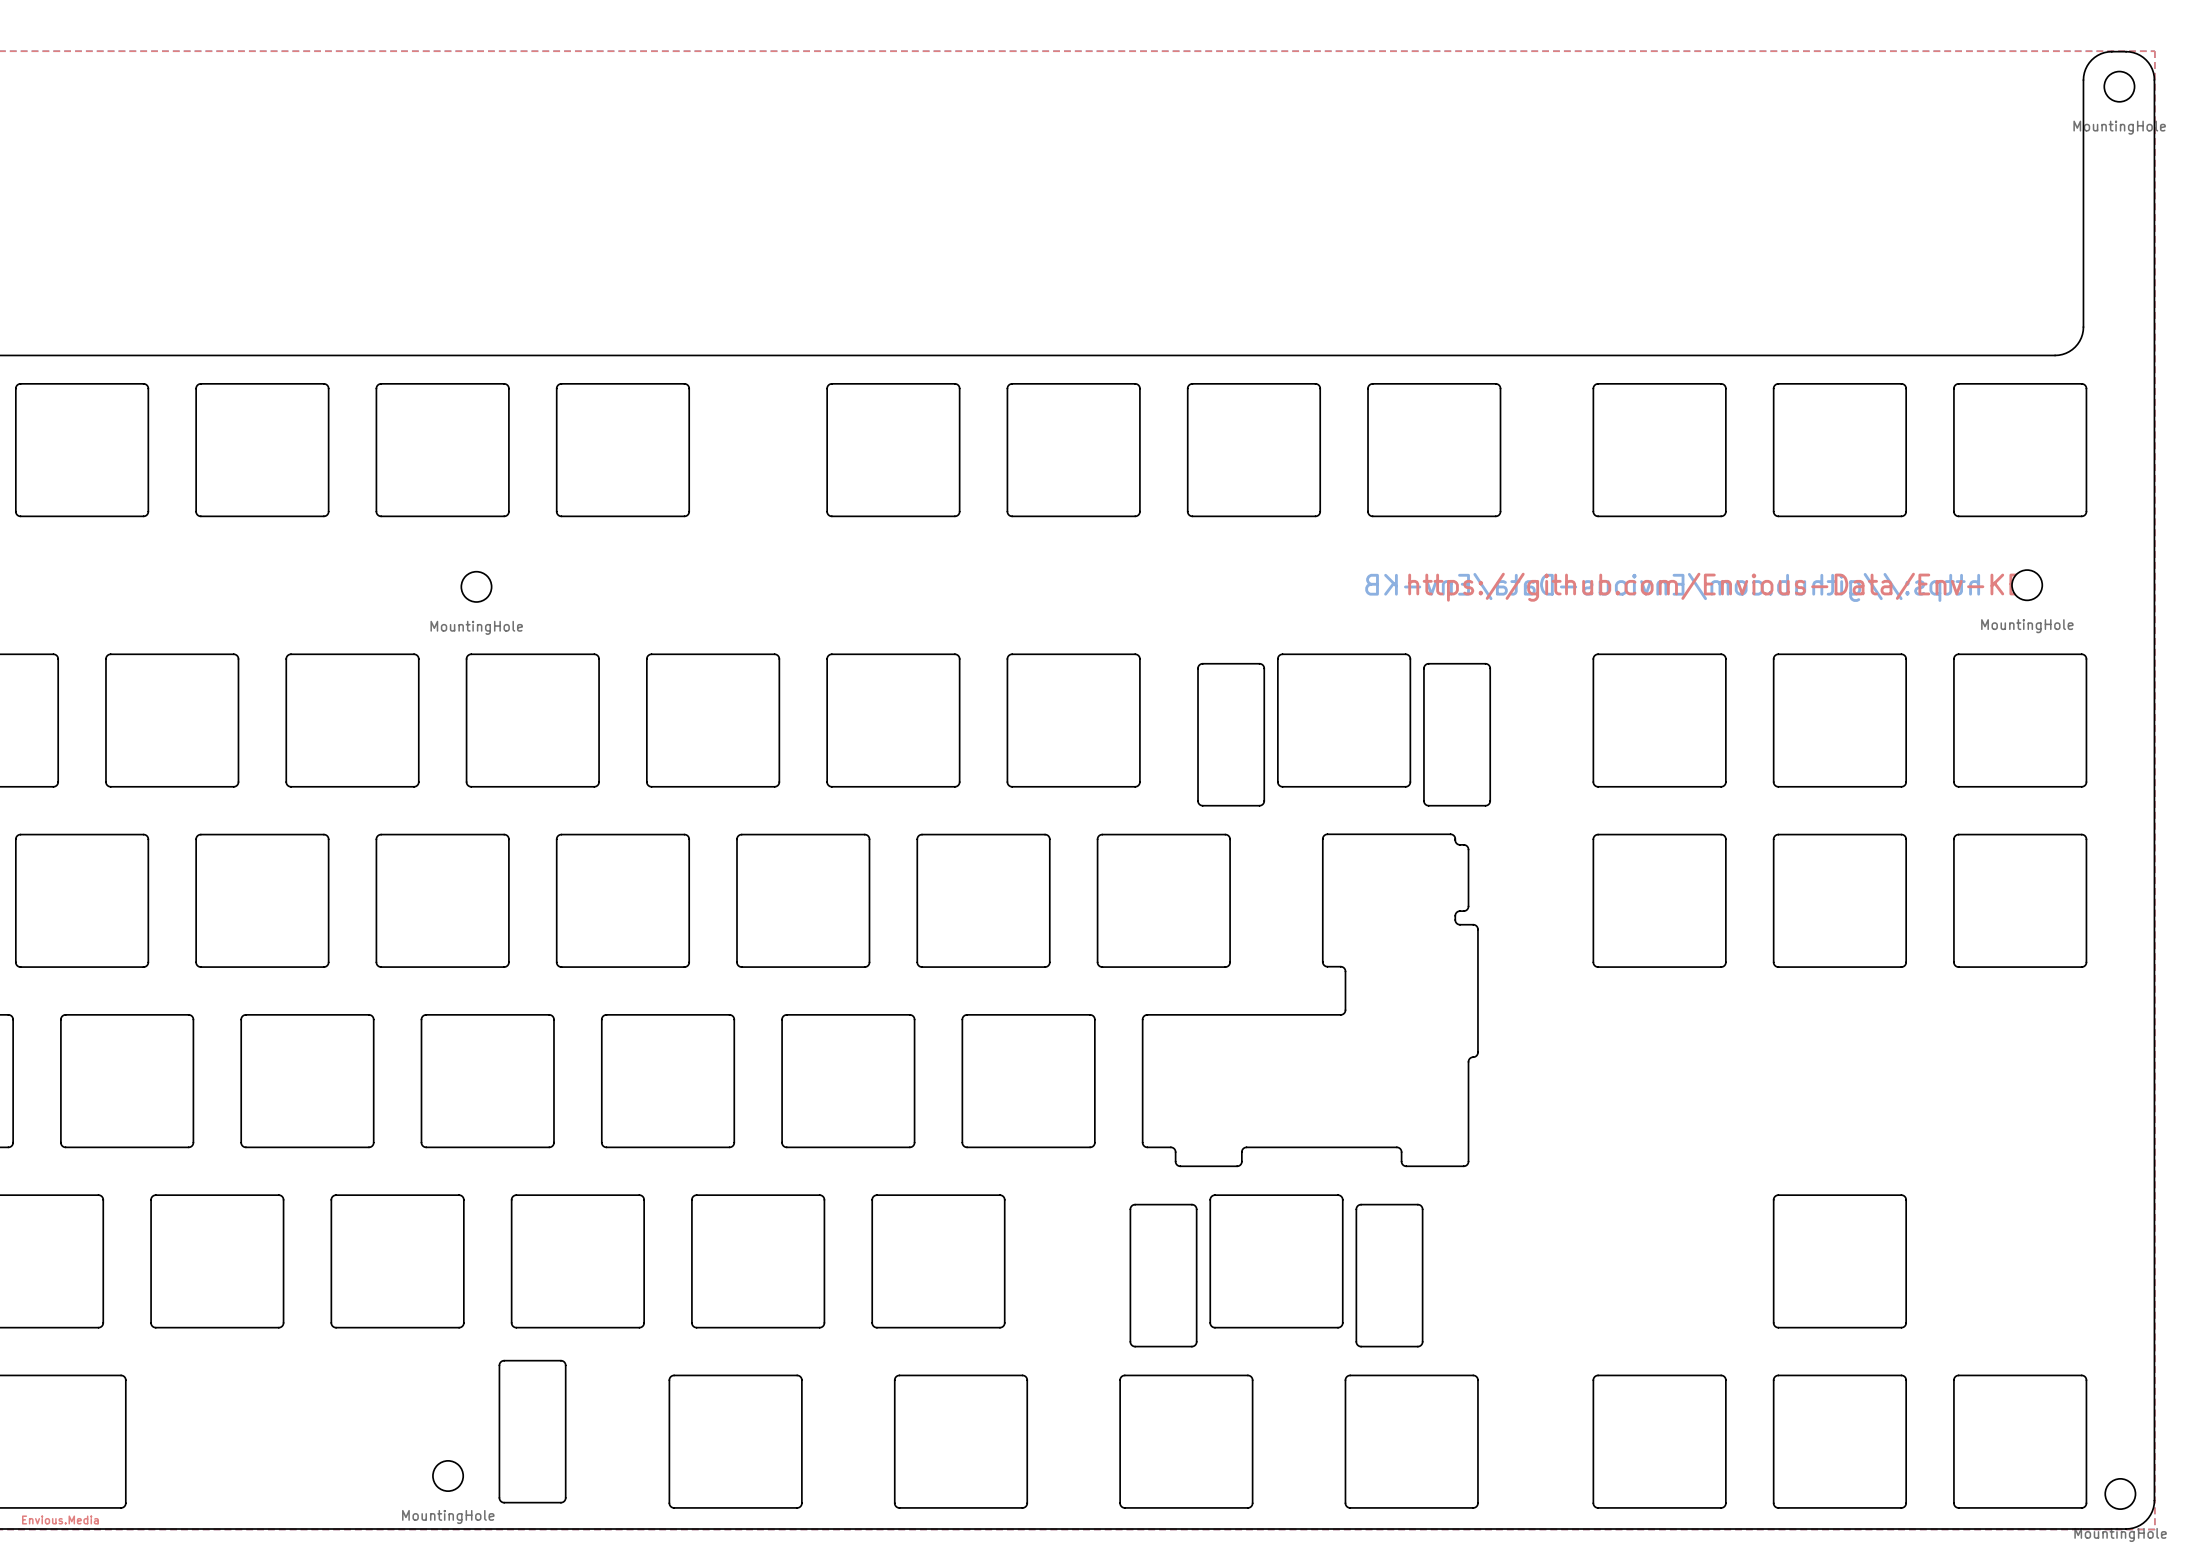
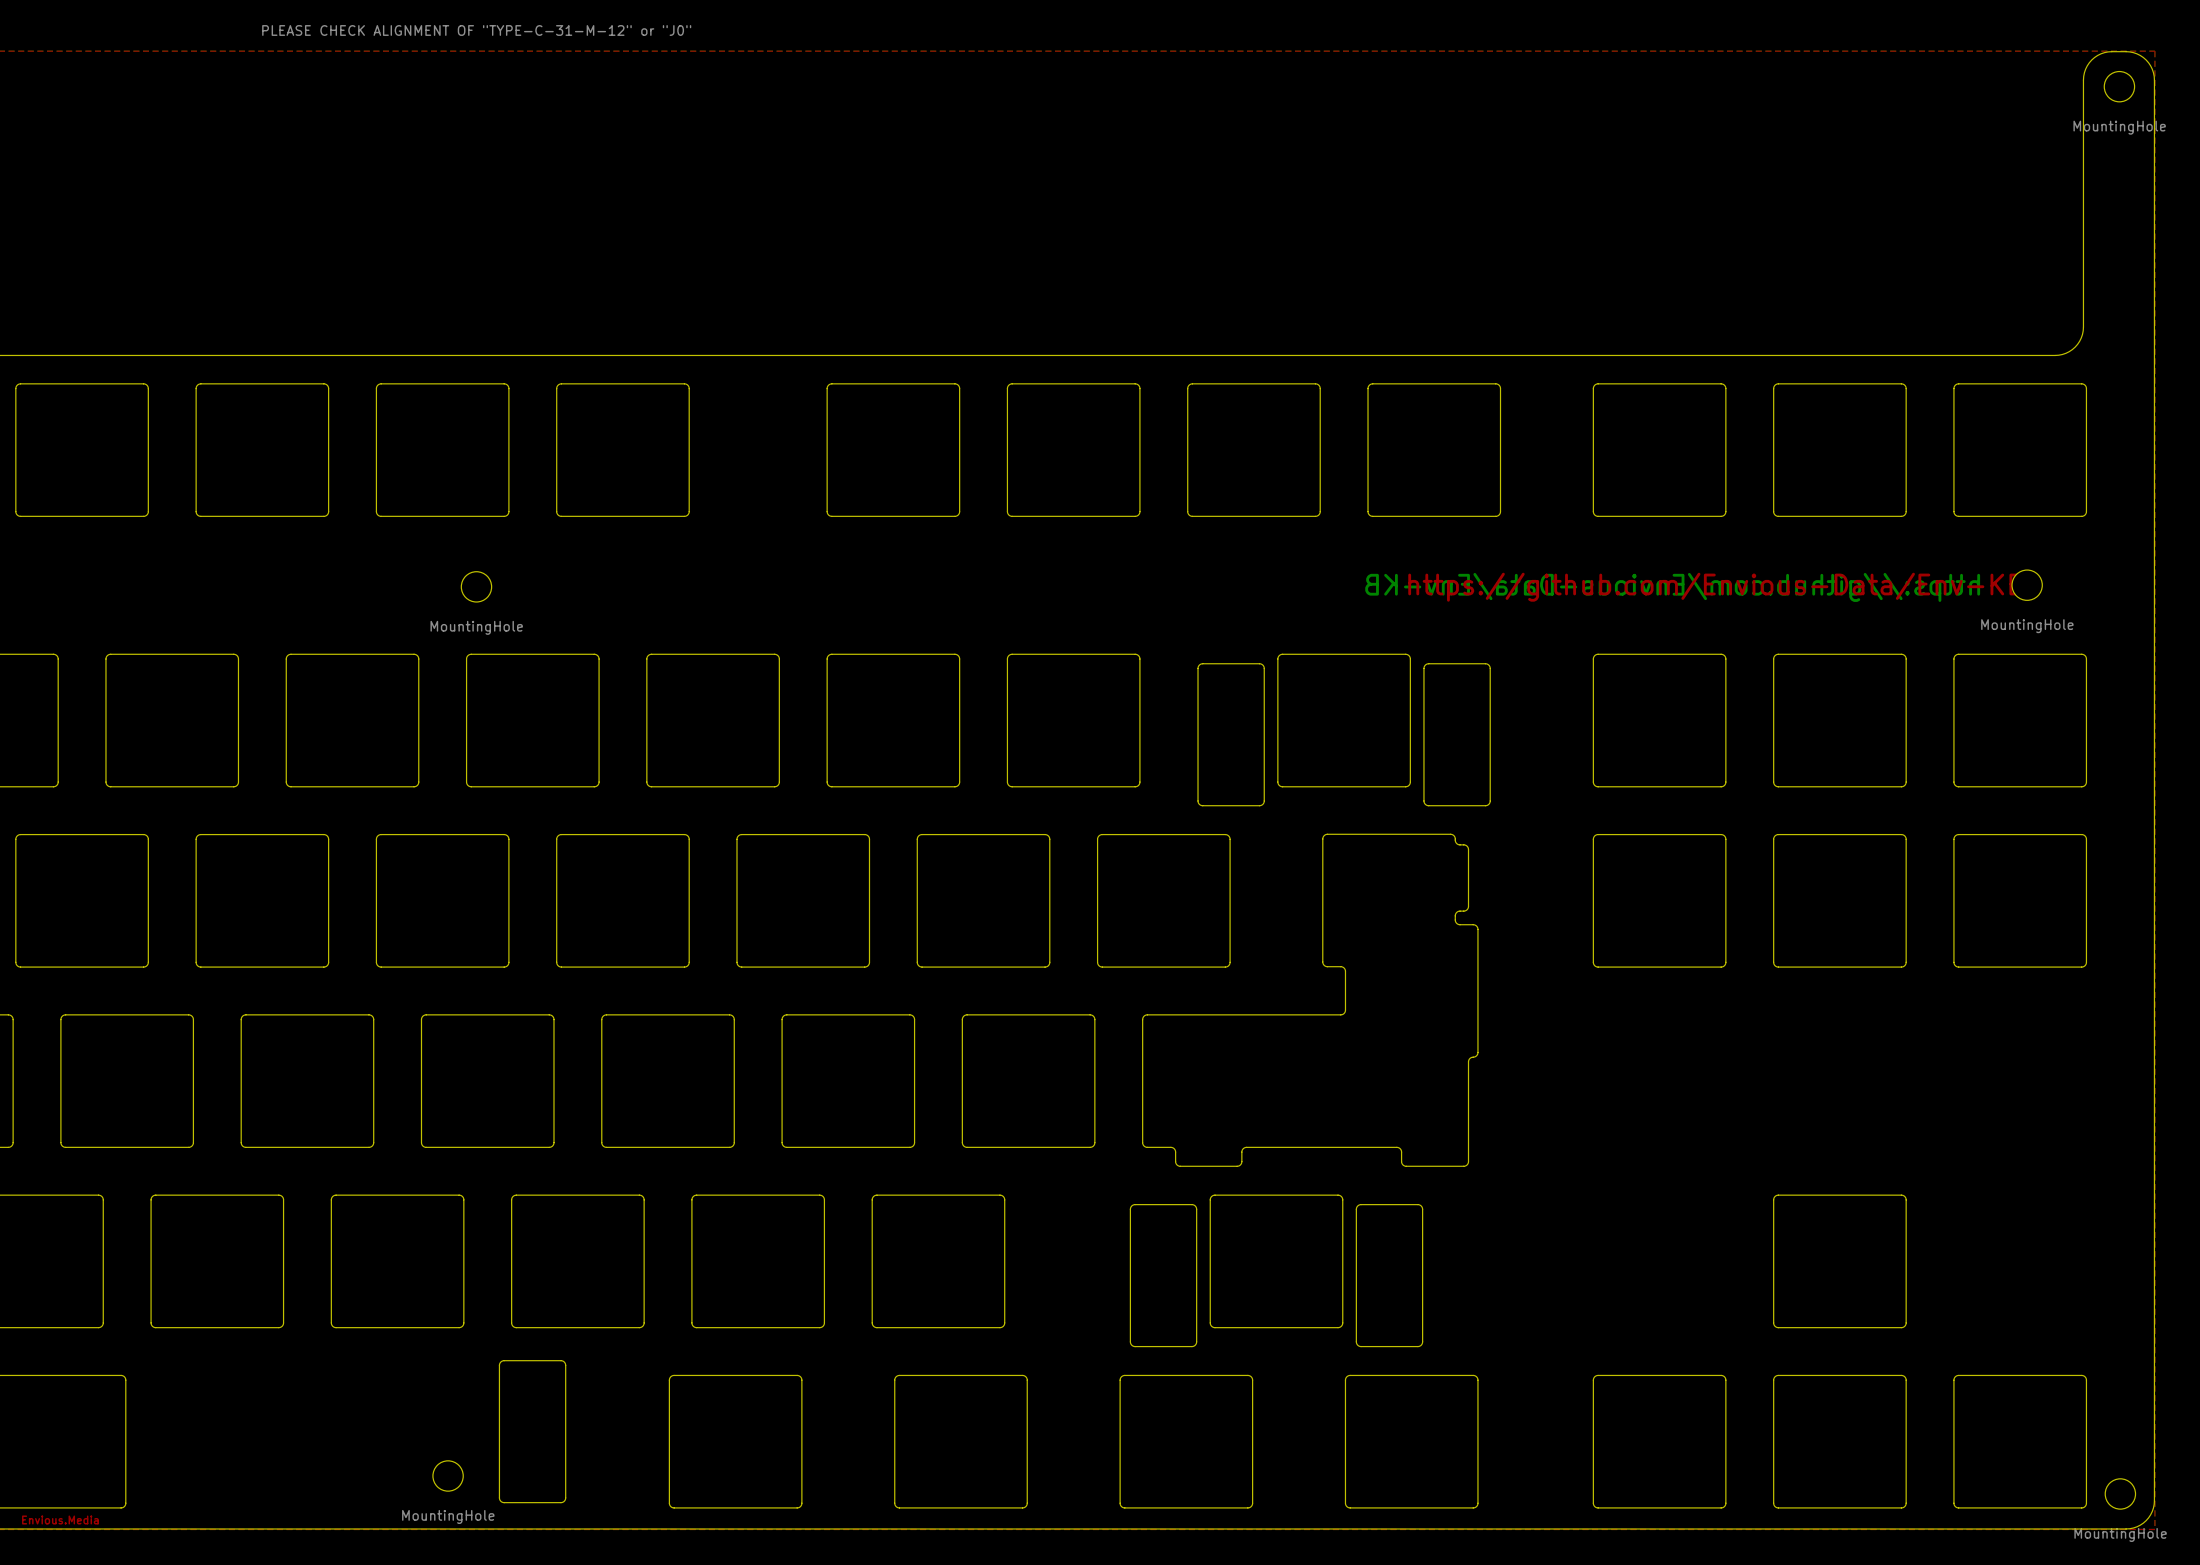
text: none -> PLEASE CHECK ALIGNMENT OF "TYPE-C-31-M-12" or "J0" (476, 30)

